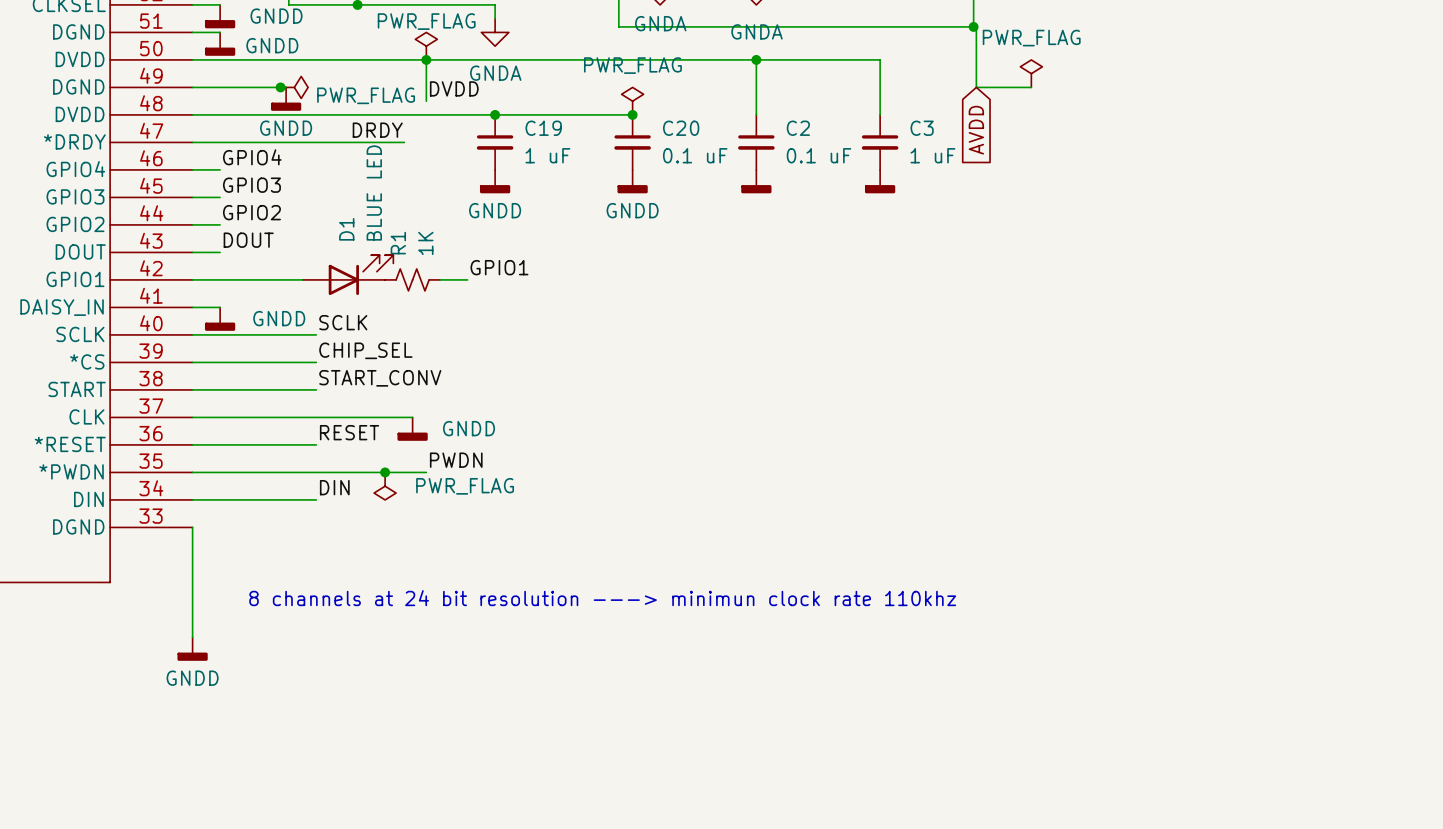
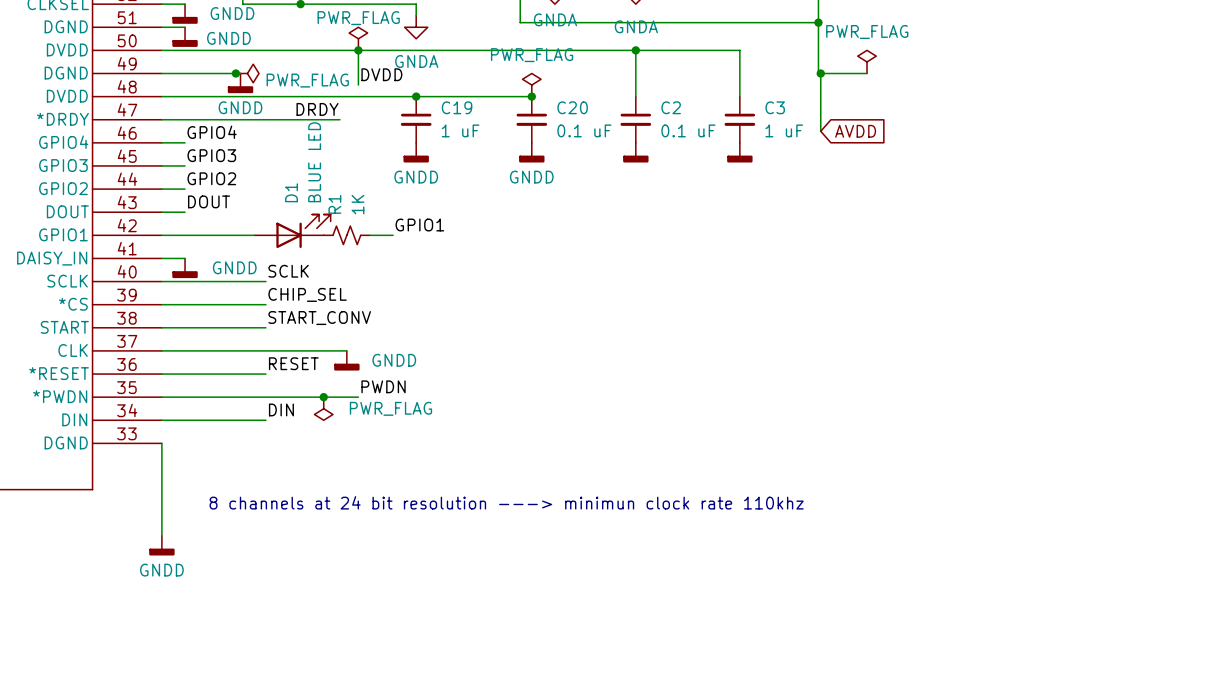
wire: (973, 26) (976, 26) (976, 87) -> (818, 22) (820, 131)
junction: none -> (820, 73)
global label rotation: 0° (976, 130) -> 90° counterclockwise (855, 131)

